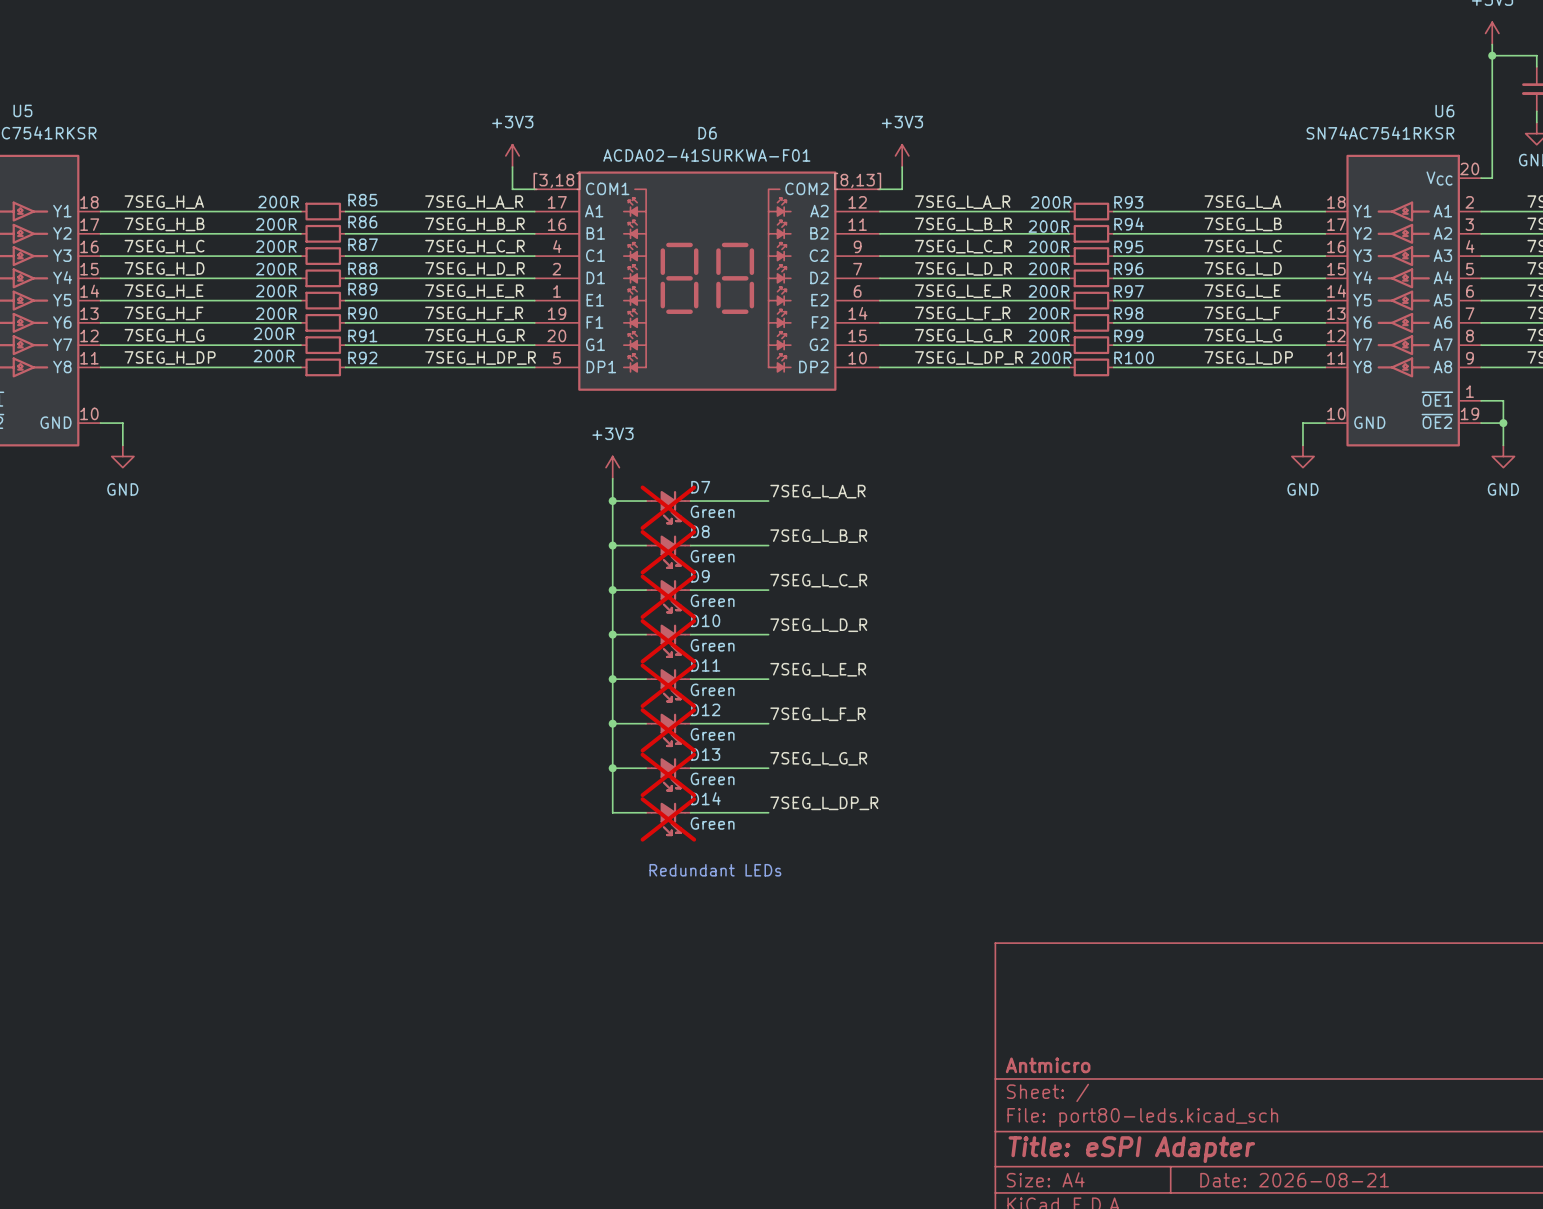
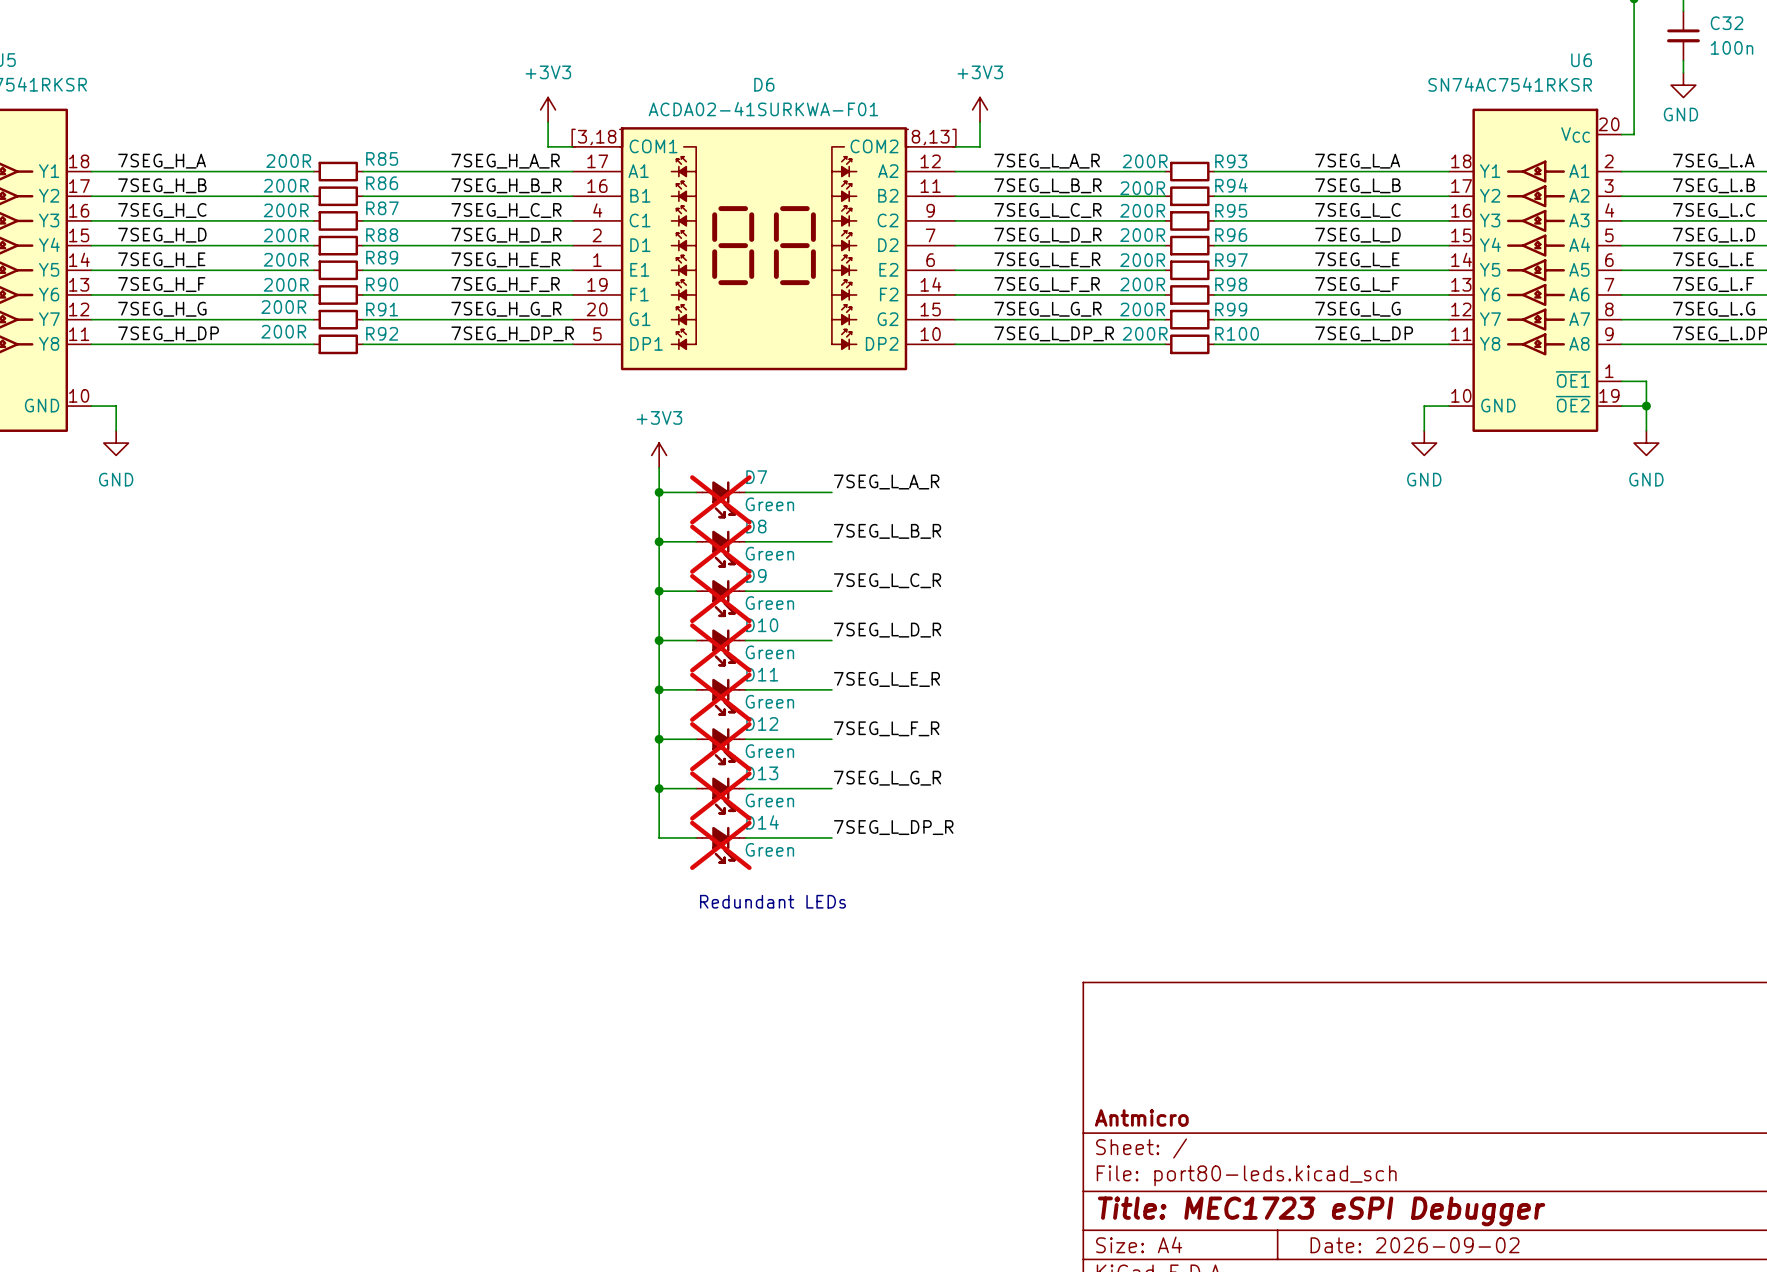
title block: Title: eSPI Adapter (1131, 1149) -> Title: MEC1723 eSPI Debugger (1321, 1211)
title block: Date: 2026-08-21 (1294, 1180) -> Date: 2026-09-02 (1415, 1245)

